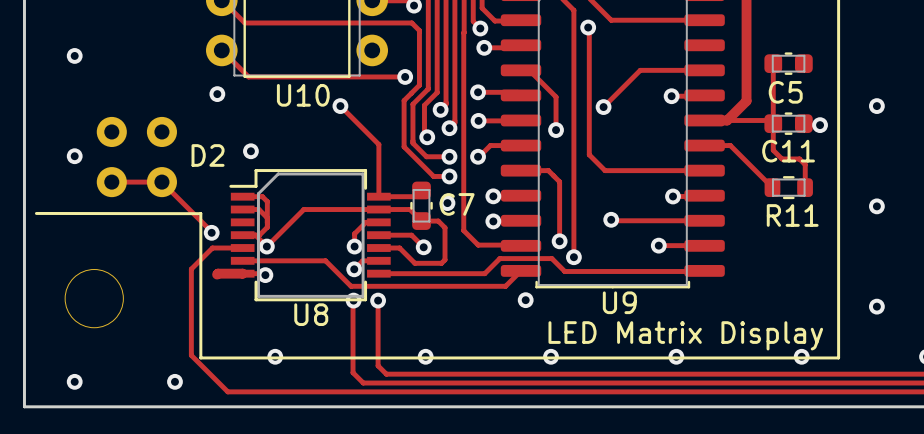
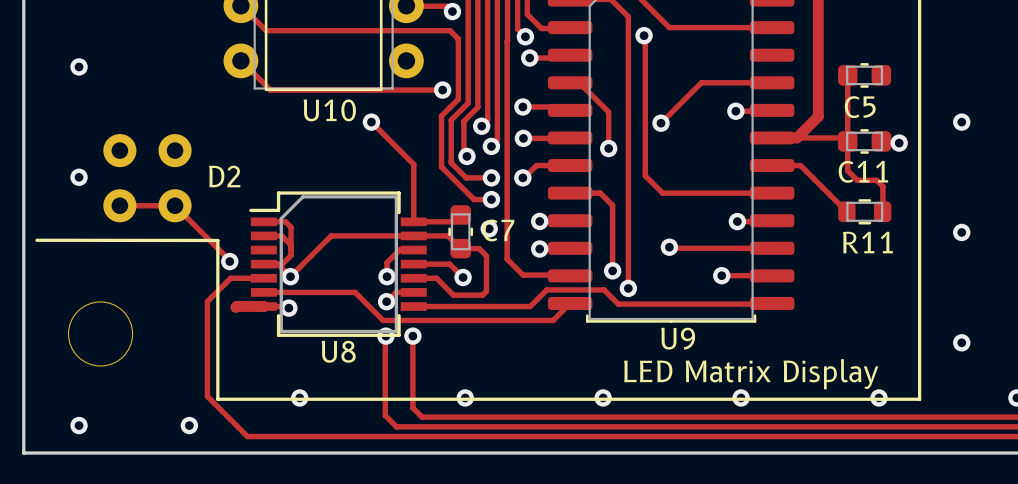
via: (217, 94) -> none
via: (250, 151) -> none
via: (525, 300) -> none

